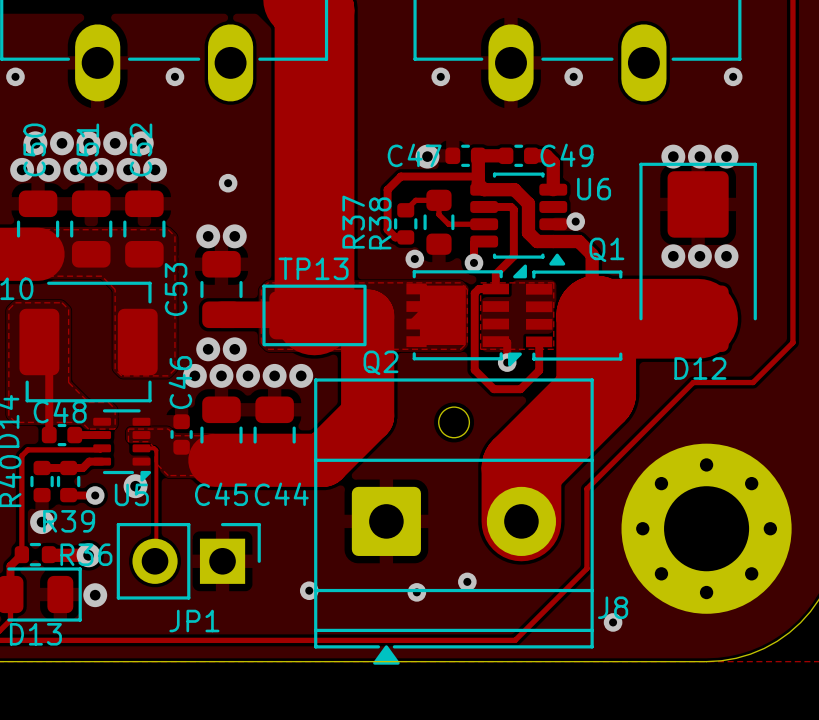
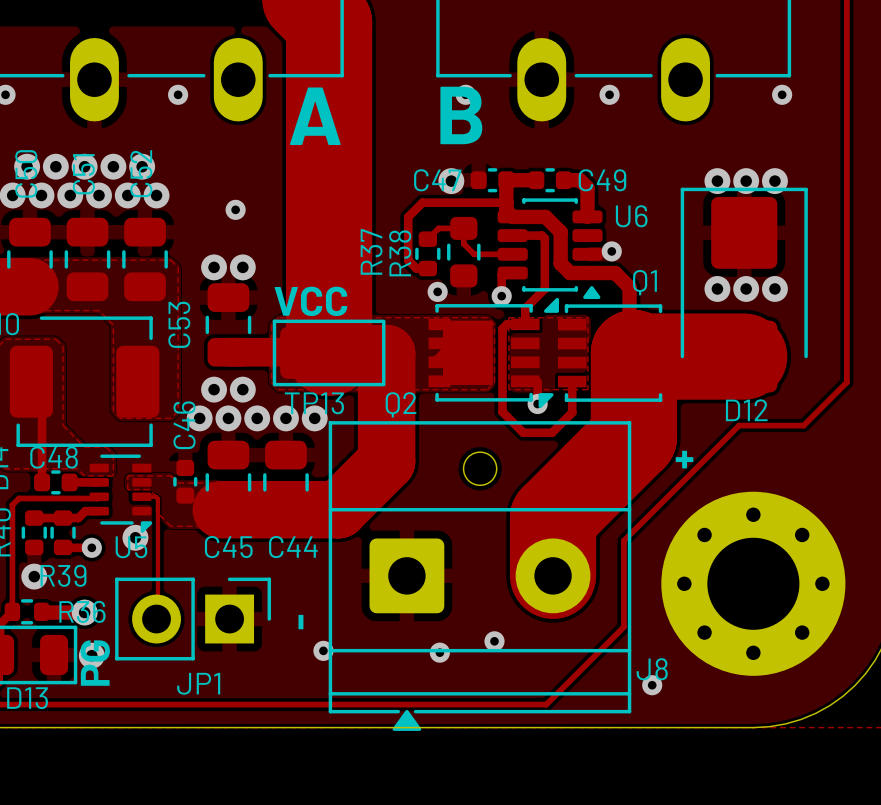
text: none -> B (461, 115)
text: none -> A (315, 116)
text: none -> VCC (310, 301)
TP13 name position: TP13 (313, 268) -> TP13 (314, 403)
text: none -> + (684, 459)
text: none -> - (300, 622)
text: none -> PG (95, 663)

